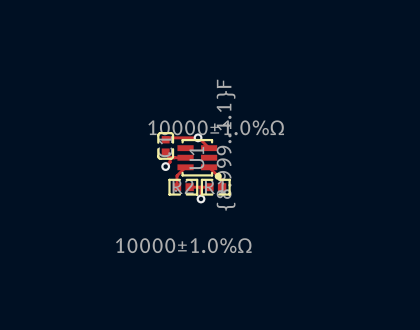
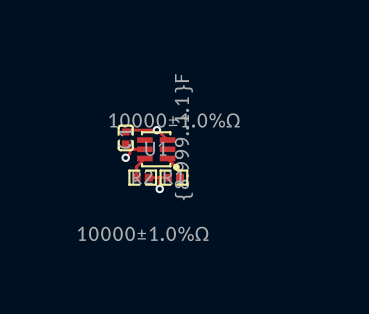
U1 name rotation: 0° (196, 158) -> 90° clockwise (155, 148)

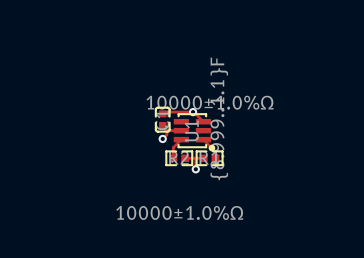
U1 name rotation: 0° (155, 148) -> 90° counterclockwise (191, 131)

